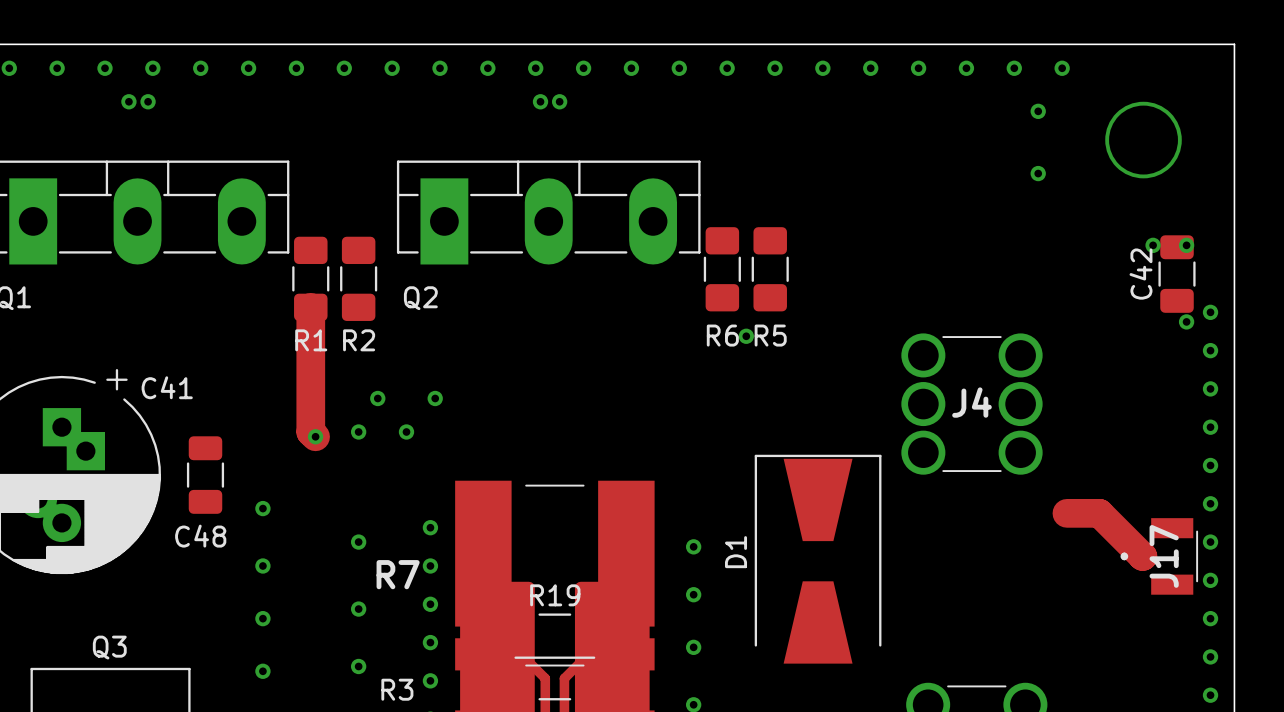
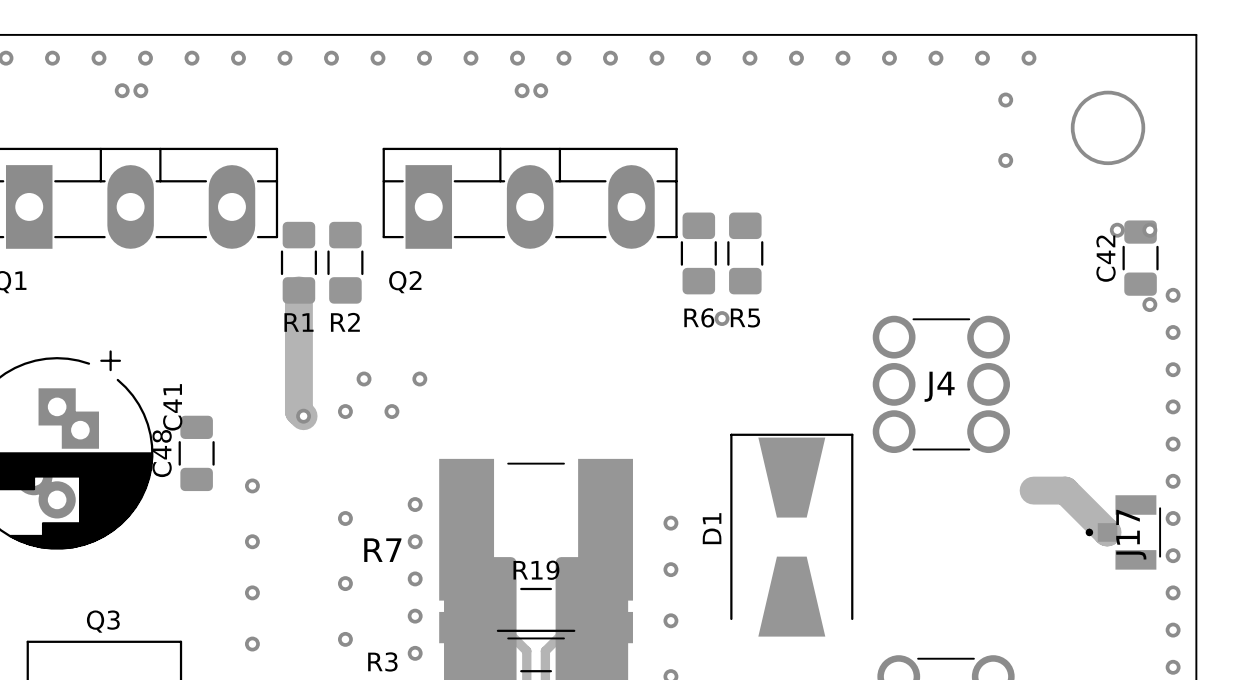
C41 name rotation: 0° (167, 387) -> 90° counterclockwise (172, 407)
C48 name rotation: 0° (200, 536) -> 90° counterclockwise (162, 453)
C48 name position: C48 (200, 536) -> C48 (162, 453)

